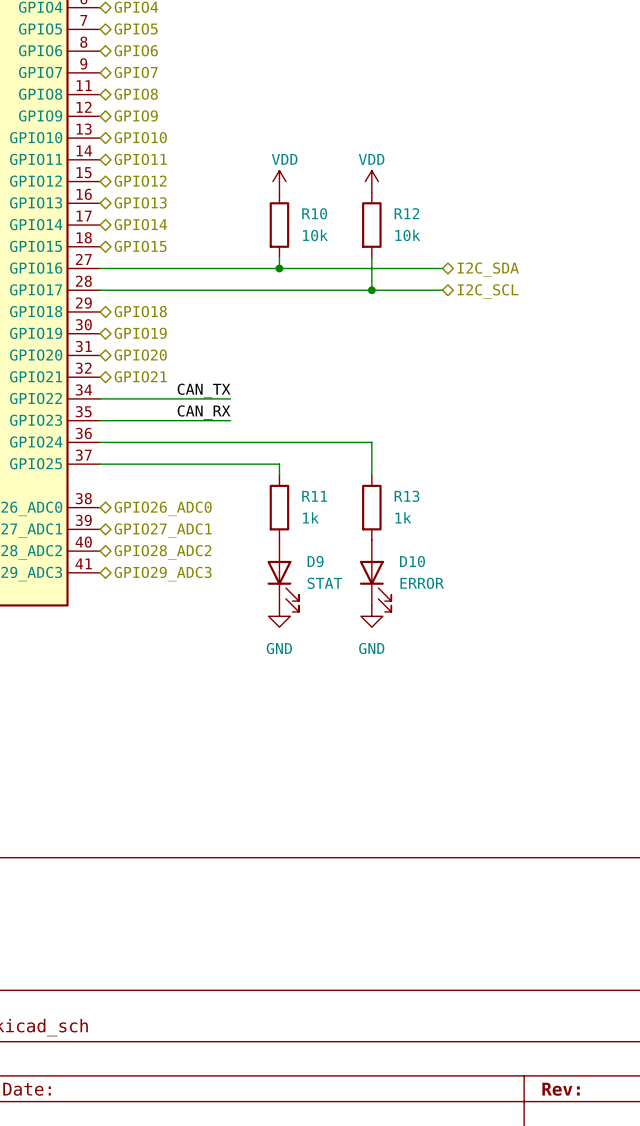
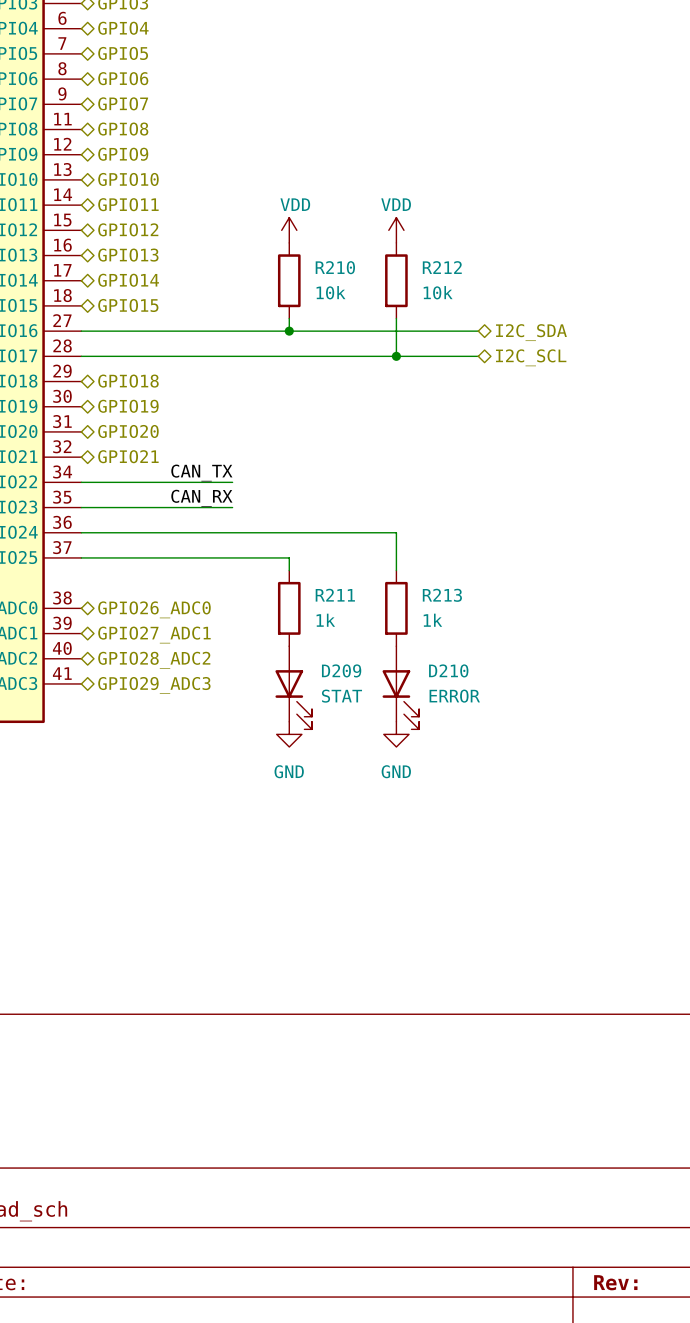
R10 name: R10 (314, 213) -> R210 (335, 267)
R12 name: R12 (406, 213) -> R212 (442, 267)
R11 name: R11 (314, 496) -> R211 (335, 595)
R13 name: R13 (407, 496) -> R213 (442, 595)
D9 name: D9 (315, 561) -> D209 (341, 670)
D10 name: D10 (412, 561) -> D210 (448, 670)

